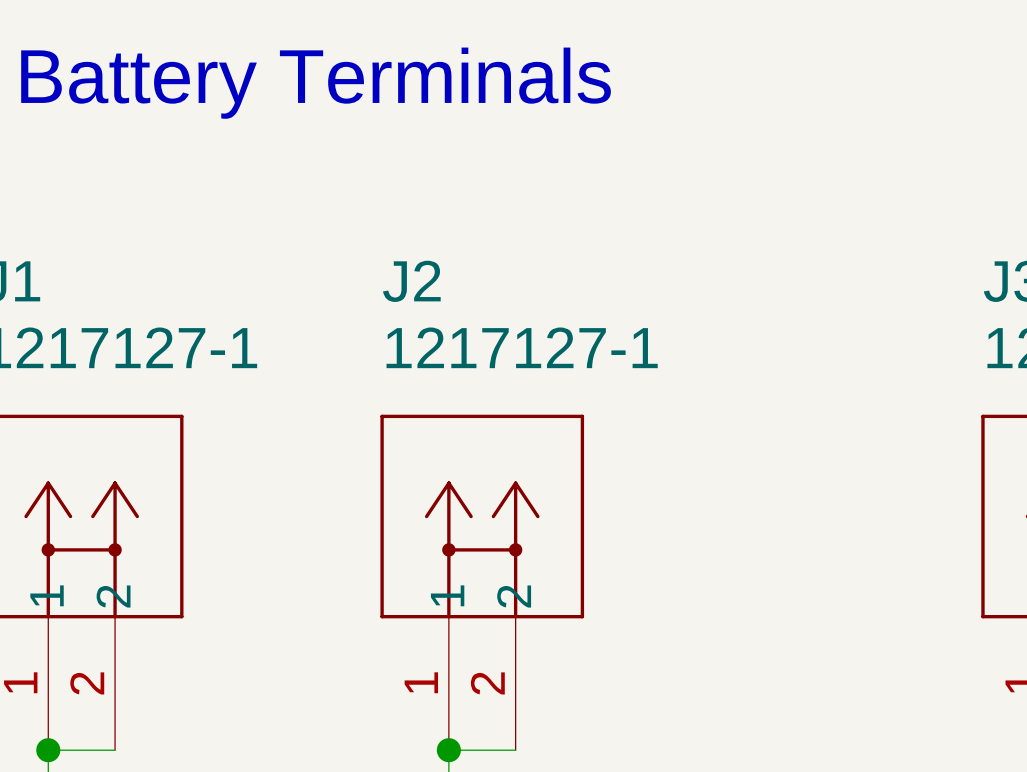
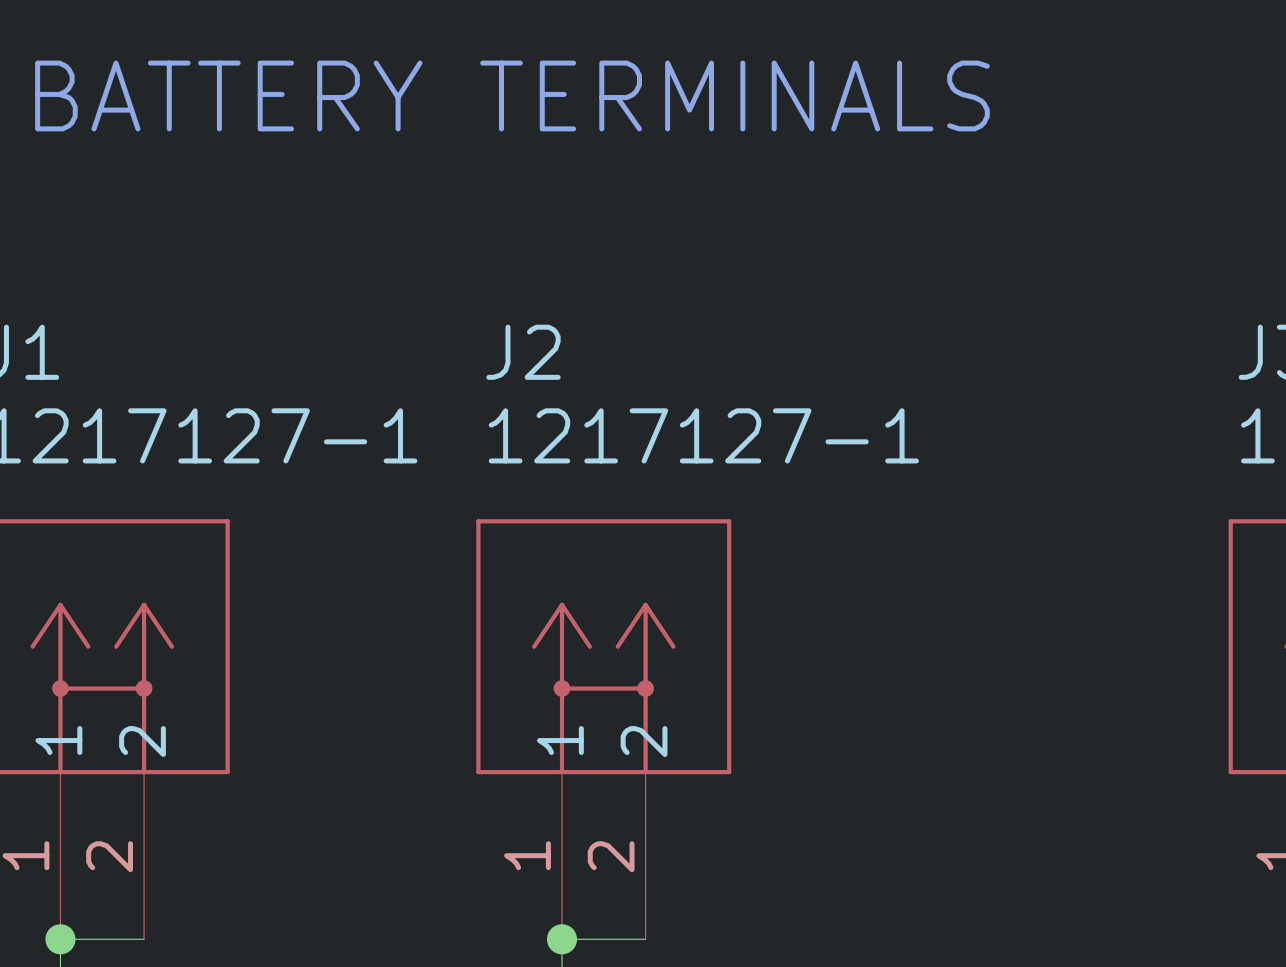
text: Battery Terminals (316, 83) -> BATTERY TERMINALS (512, 95)

